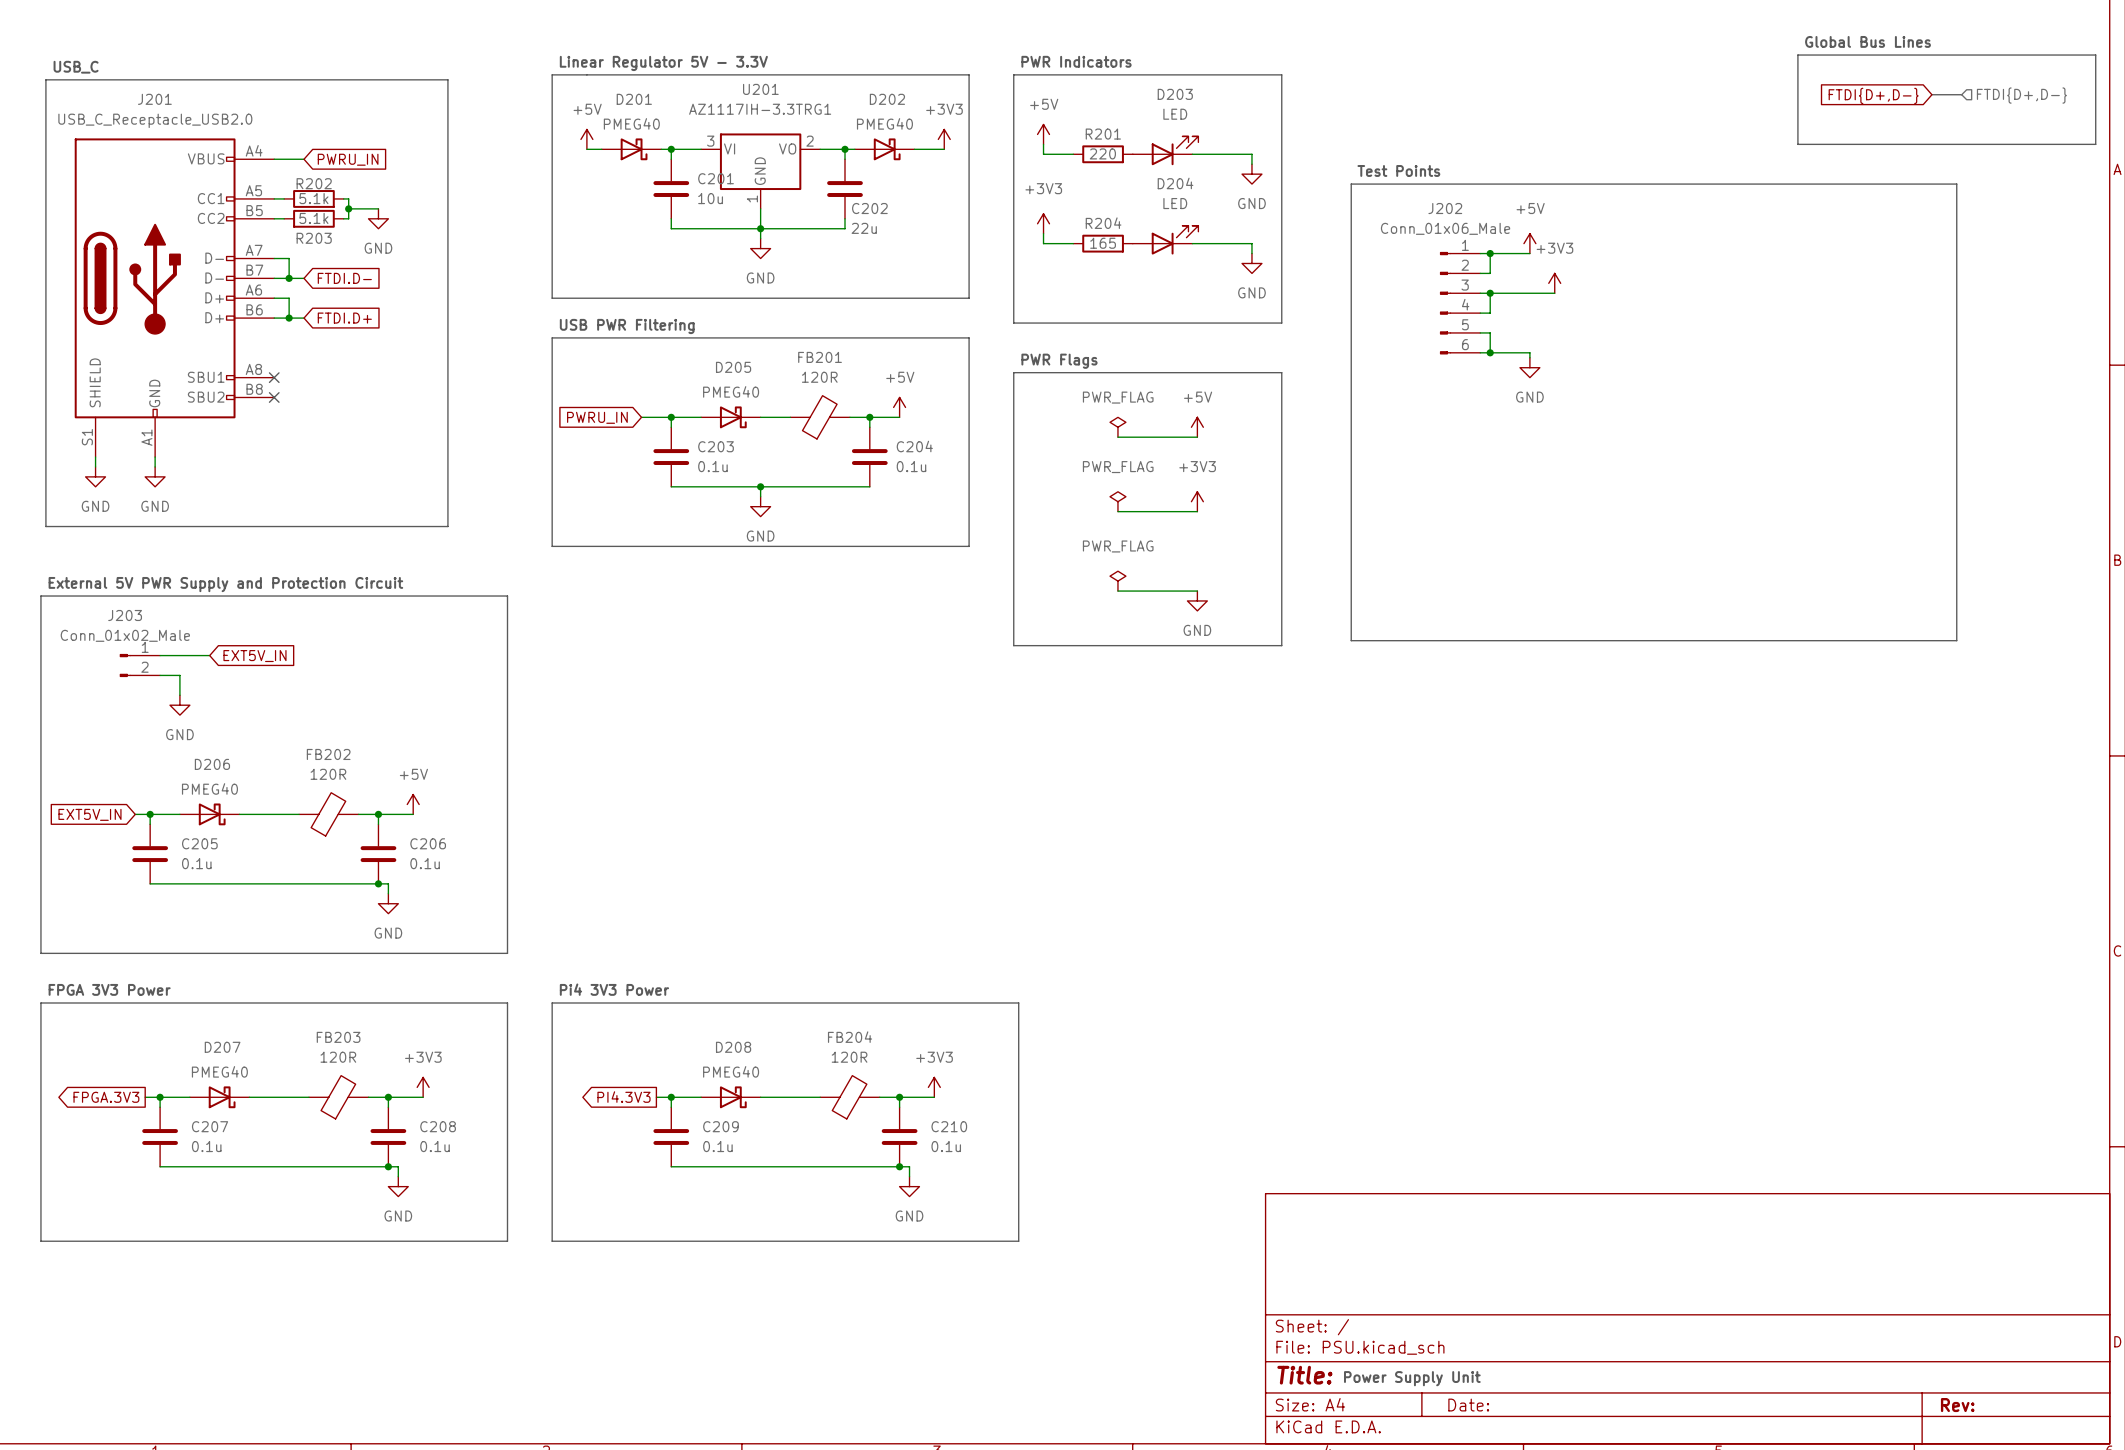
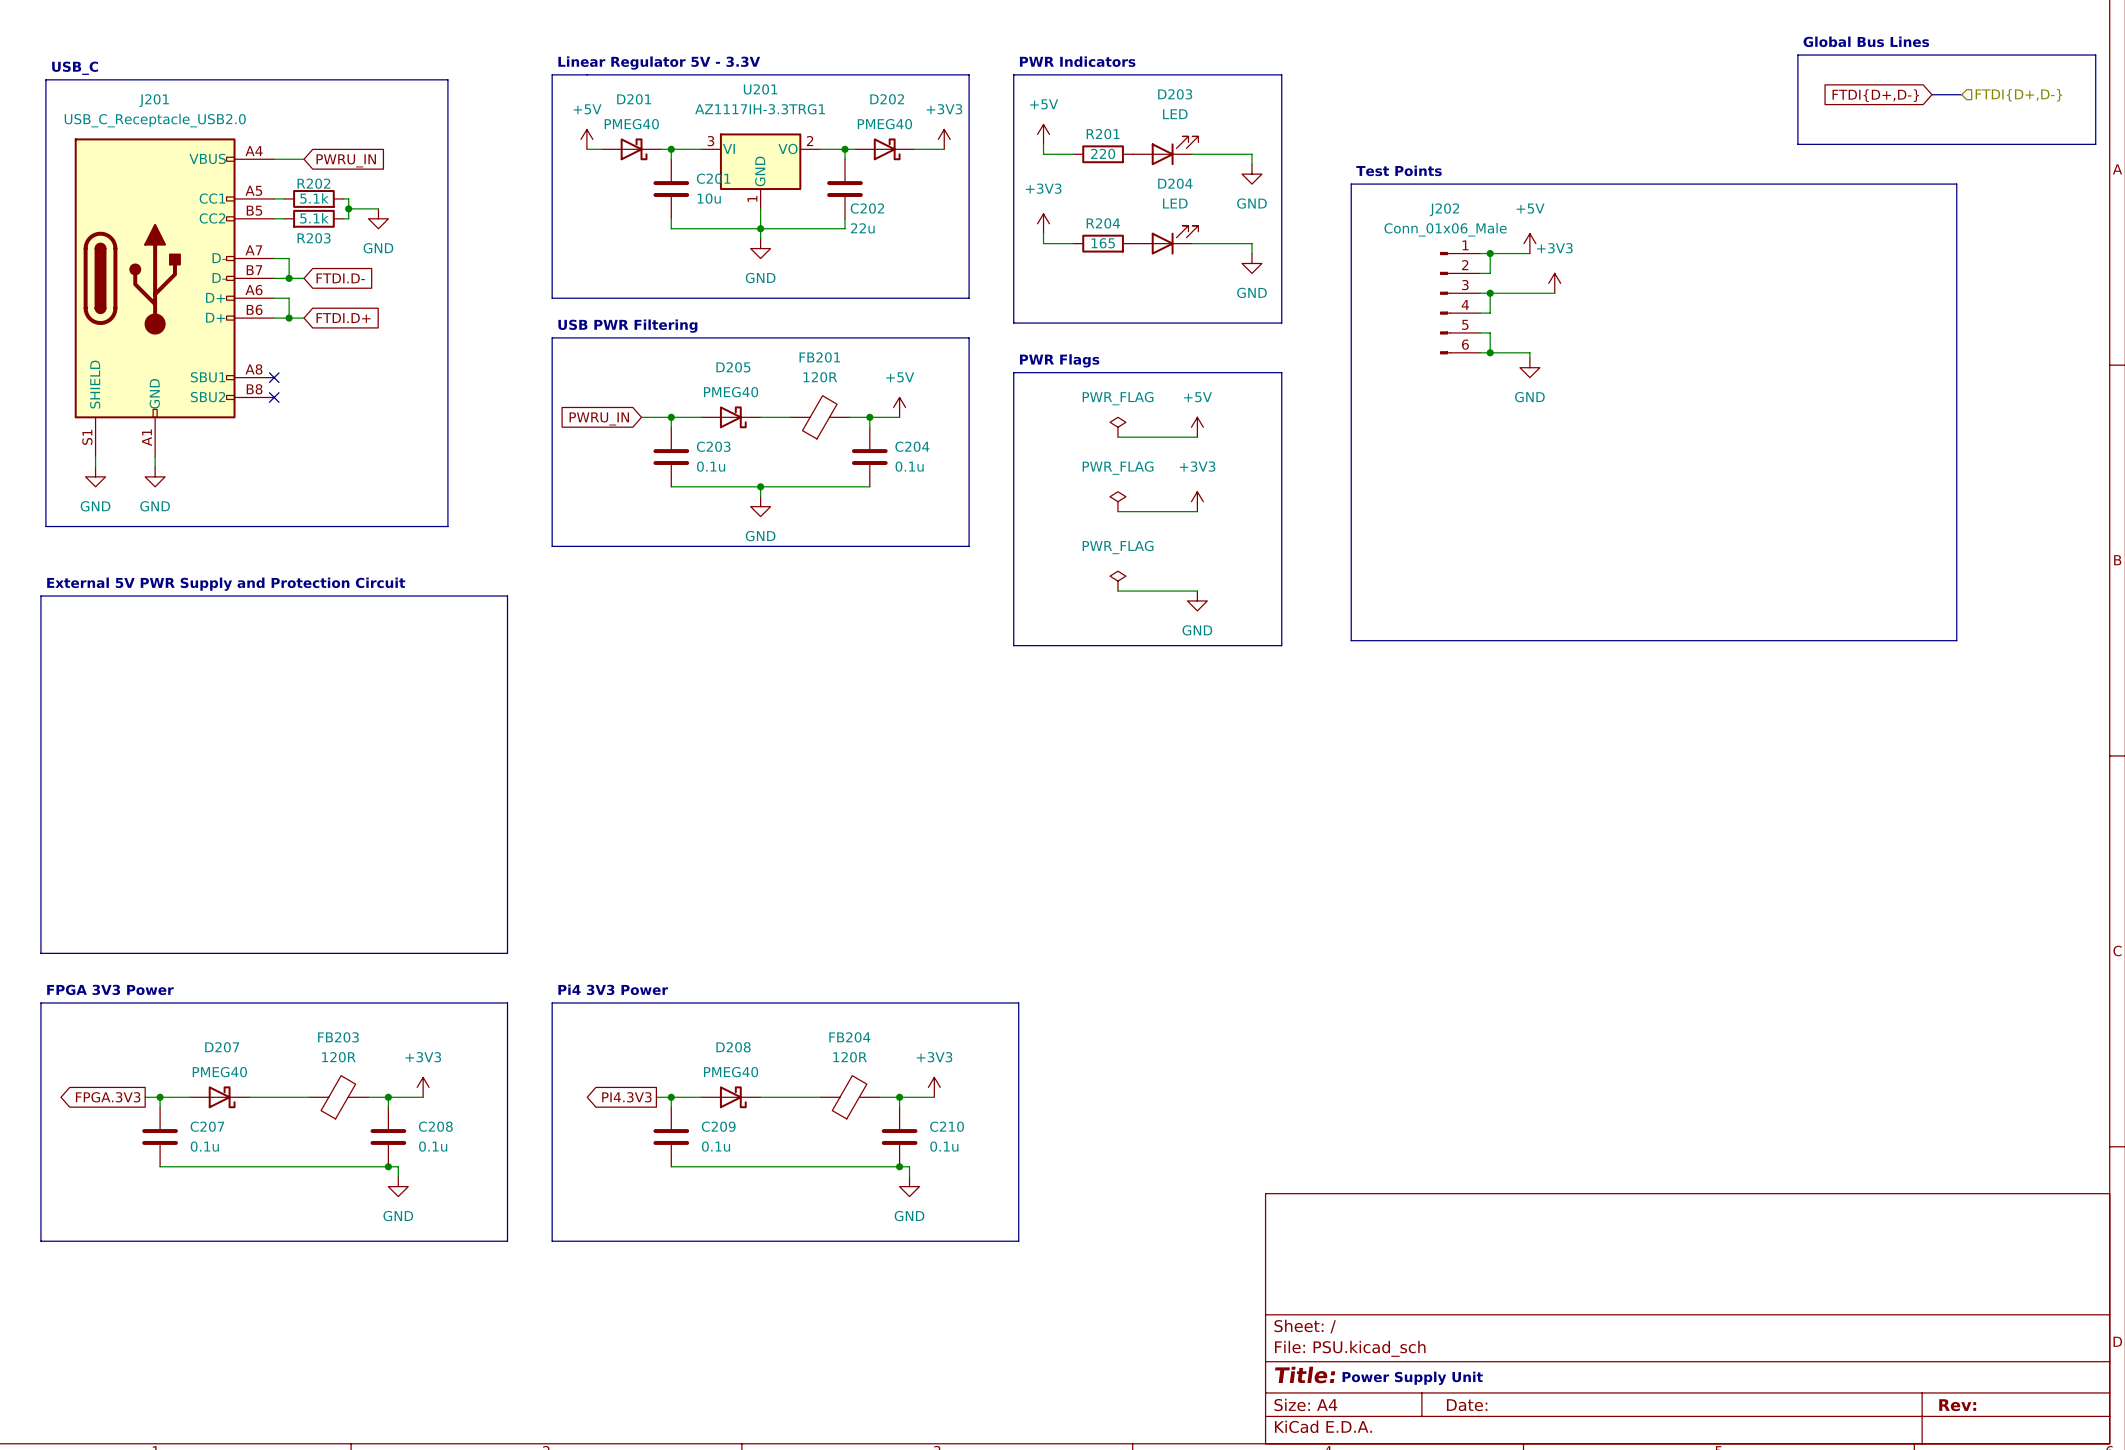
wire: (160, 655) (209, 655) -> none
global label: EXT5V_IN (254, 656) -> none
J203: Conn_01x02_Male (139, 665) -> none
wire: (160, 675) (179, 675) (179, 695) -> none
power symbol: GND (179, 705) -> none
power symbol: +5V (413, 804) -> none
global label: EXT5V_IN (89, 814) -> none
wire: (135, 814) (179, 814) -> none
wire: (150, 814) (150, 824) -> none
junction: (150, 814) -> none
D206: PMEG40 (209, 814) -> none
wire: (239, 814) (299, 814) -> none
FB202: 120R (328, 814) -> none
wire: (358, 814) (413, 814) -> none
wire: (378, 814) (378, 824) -> none
junction: (378, 814) -> none
C205: 0.1u (150, 854) -> none
C206: 0.1u (378, 854) -> none
wire: (150, 883) (388, 883) (388, 893) -> none
junction: (378, 883) -> none
power symbol: GND (388, 903) -> none

